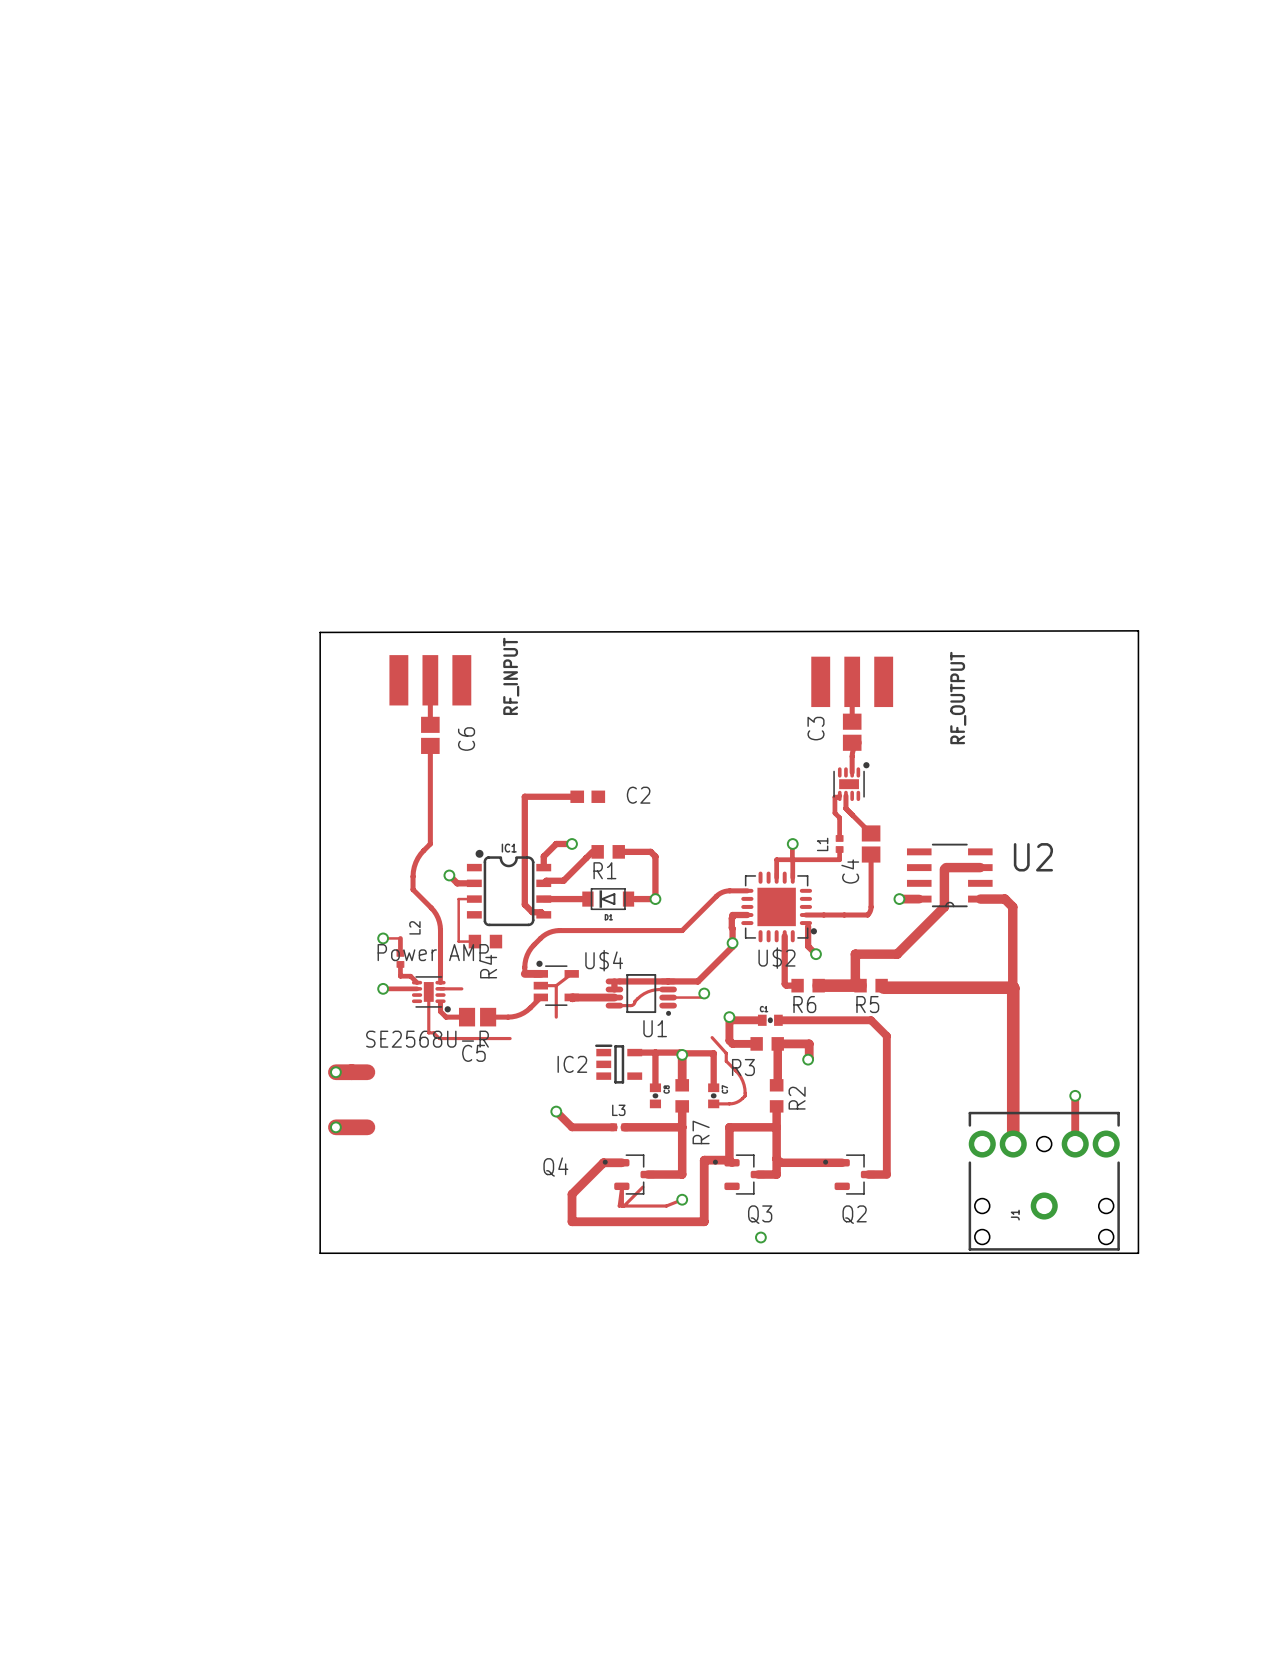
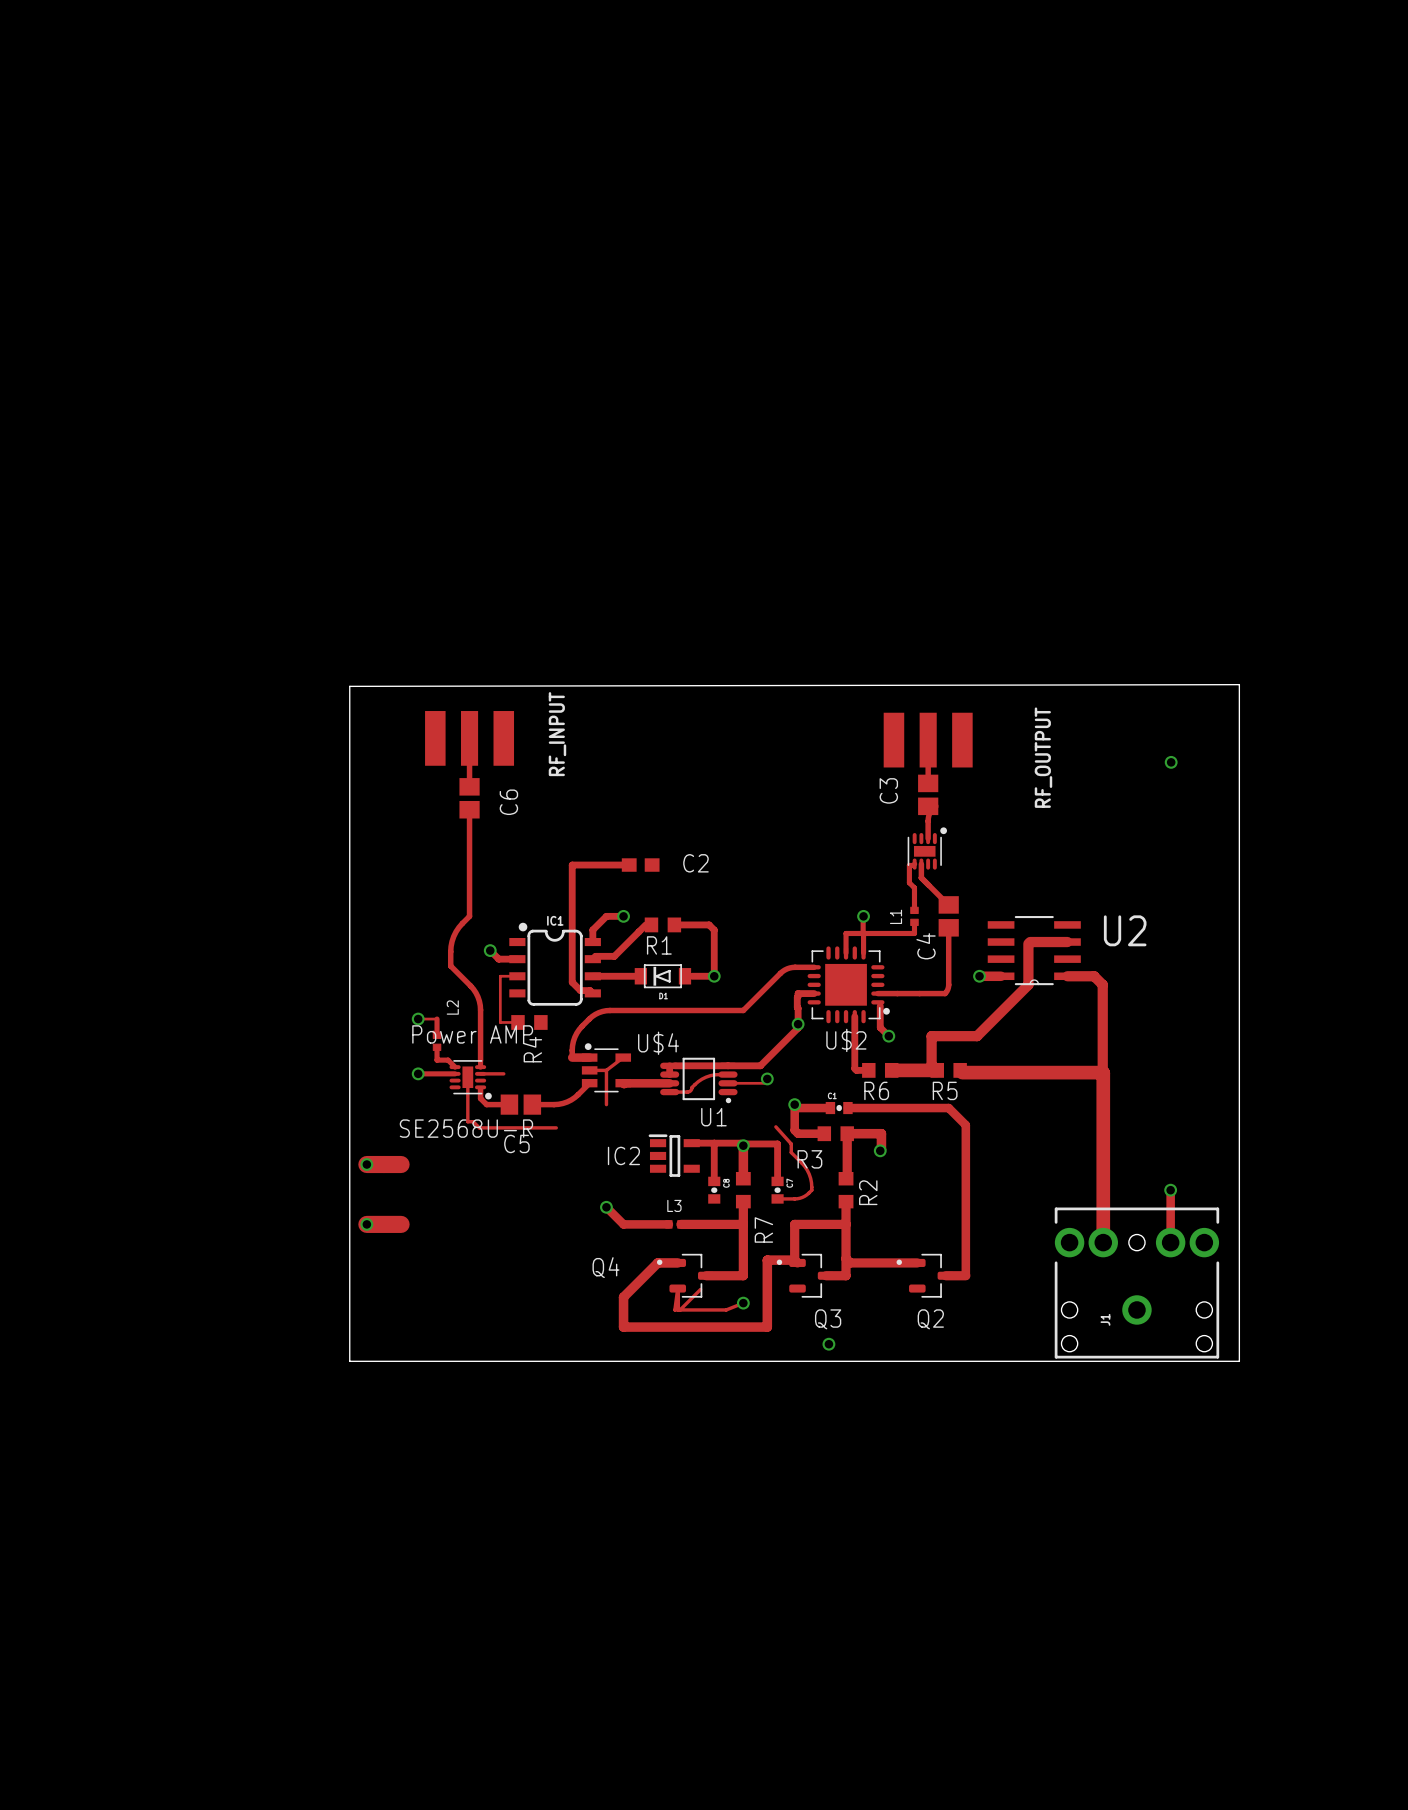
via: none -> (1171, 762)

